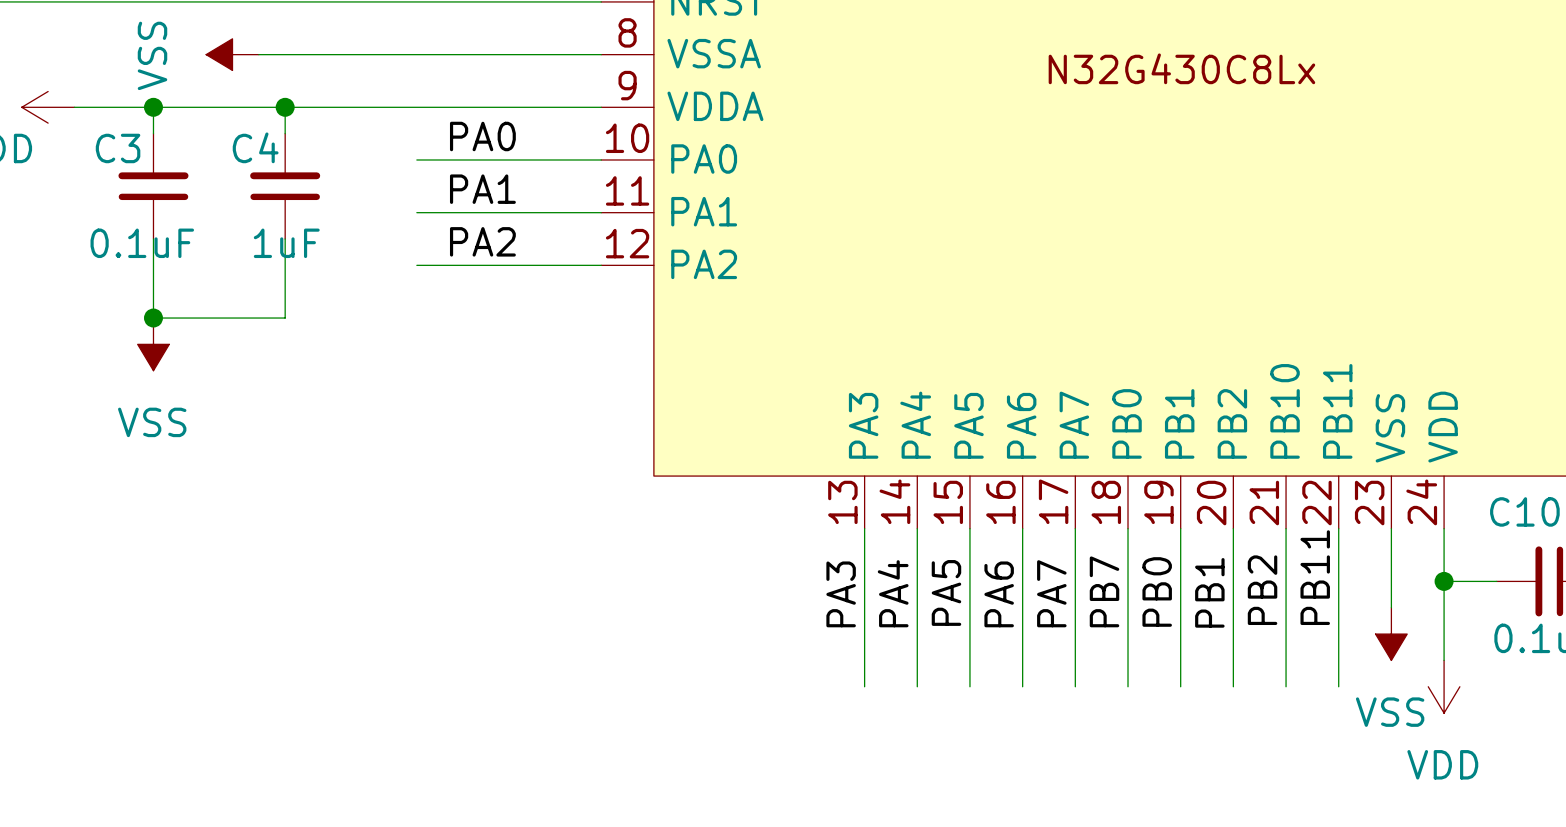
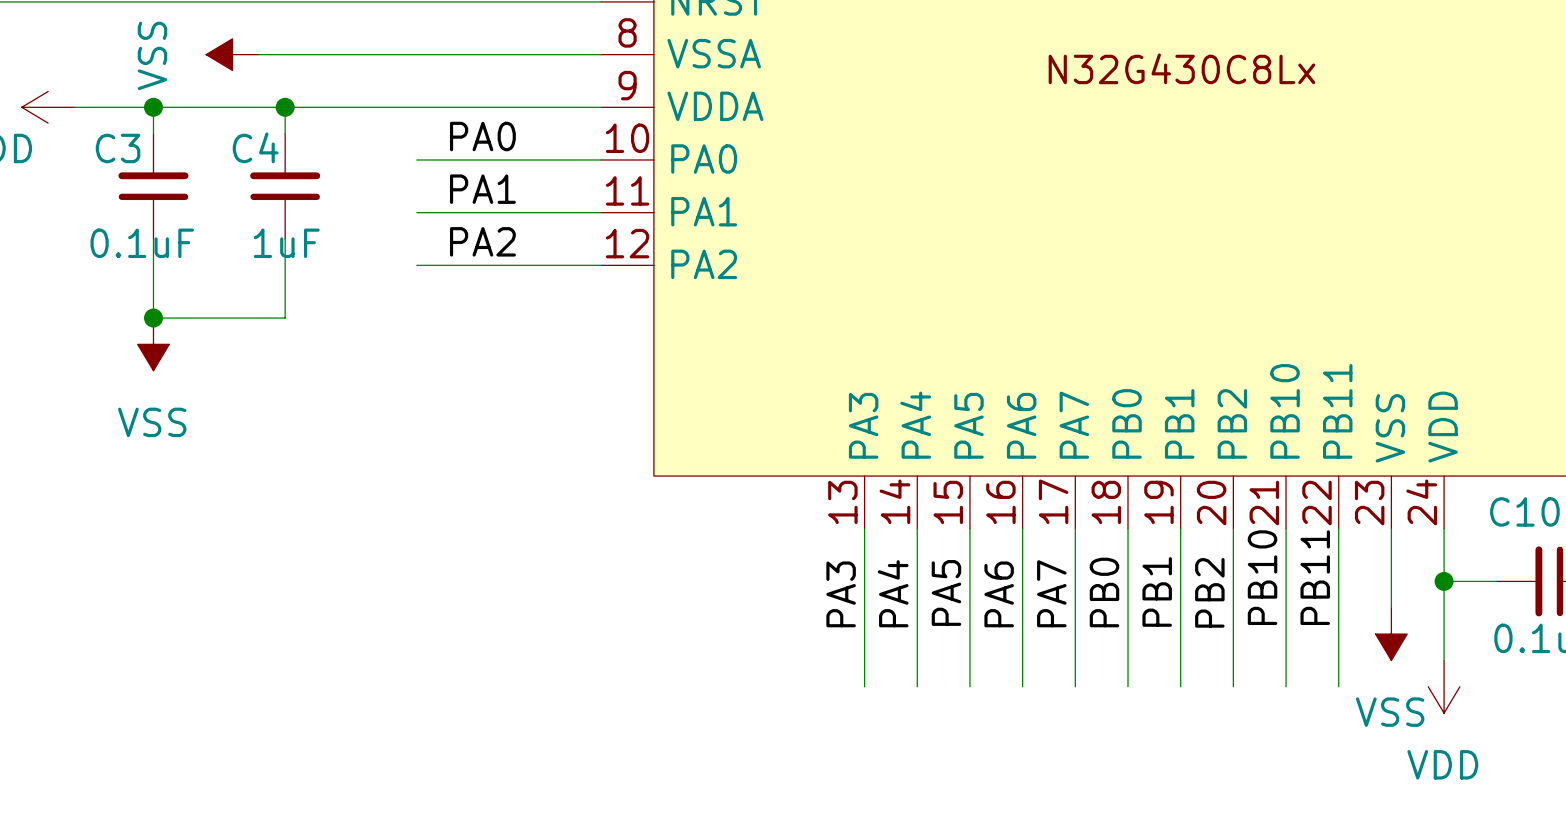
label: PB2 (1262, 590) -> PB10 (1262, 577)
label: PB7 (1104, 591) -> PB0 (1104, 592)
label: PB0 (1157, 591) -> PB1 (1157, 591)
label: PB1 (1209, 592) -> PB2 (1209, 592)

